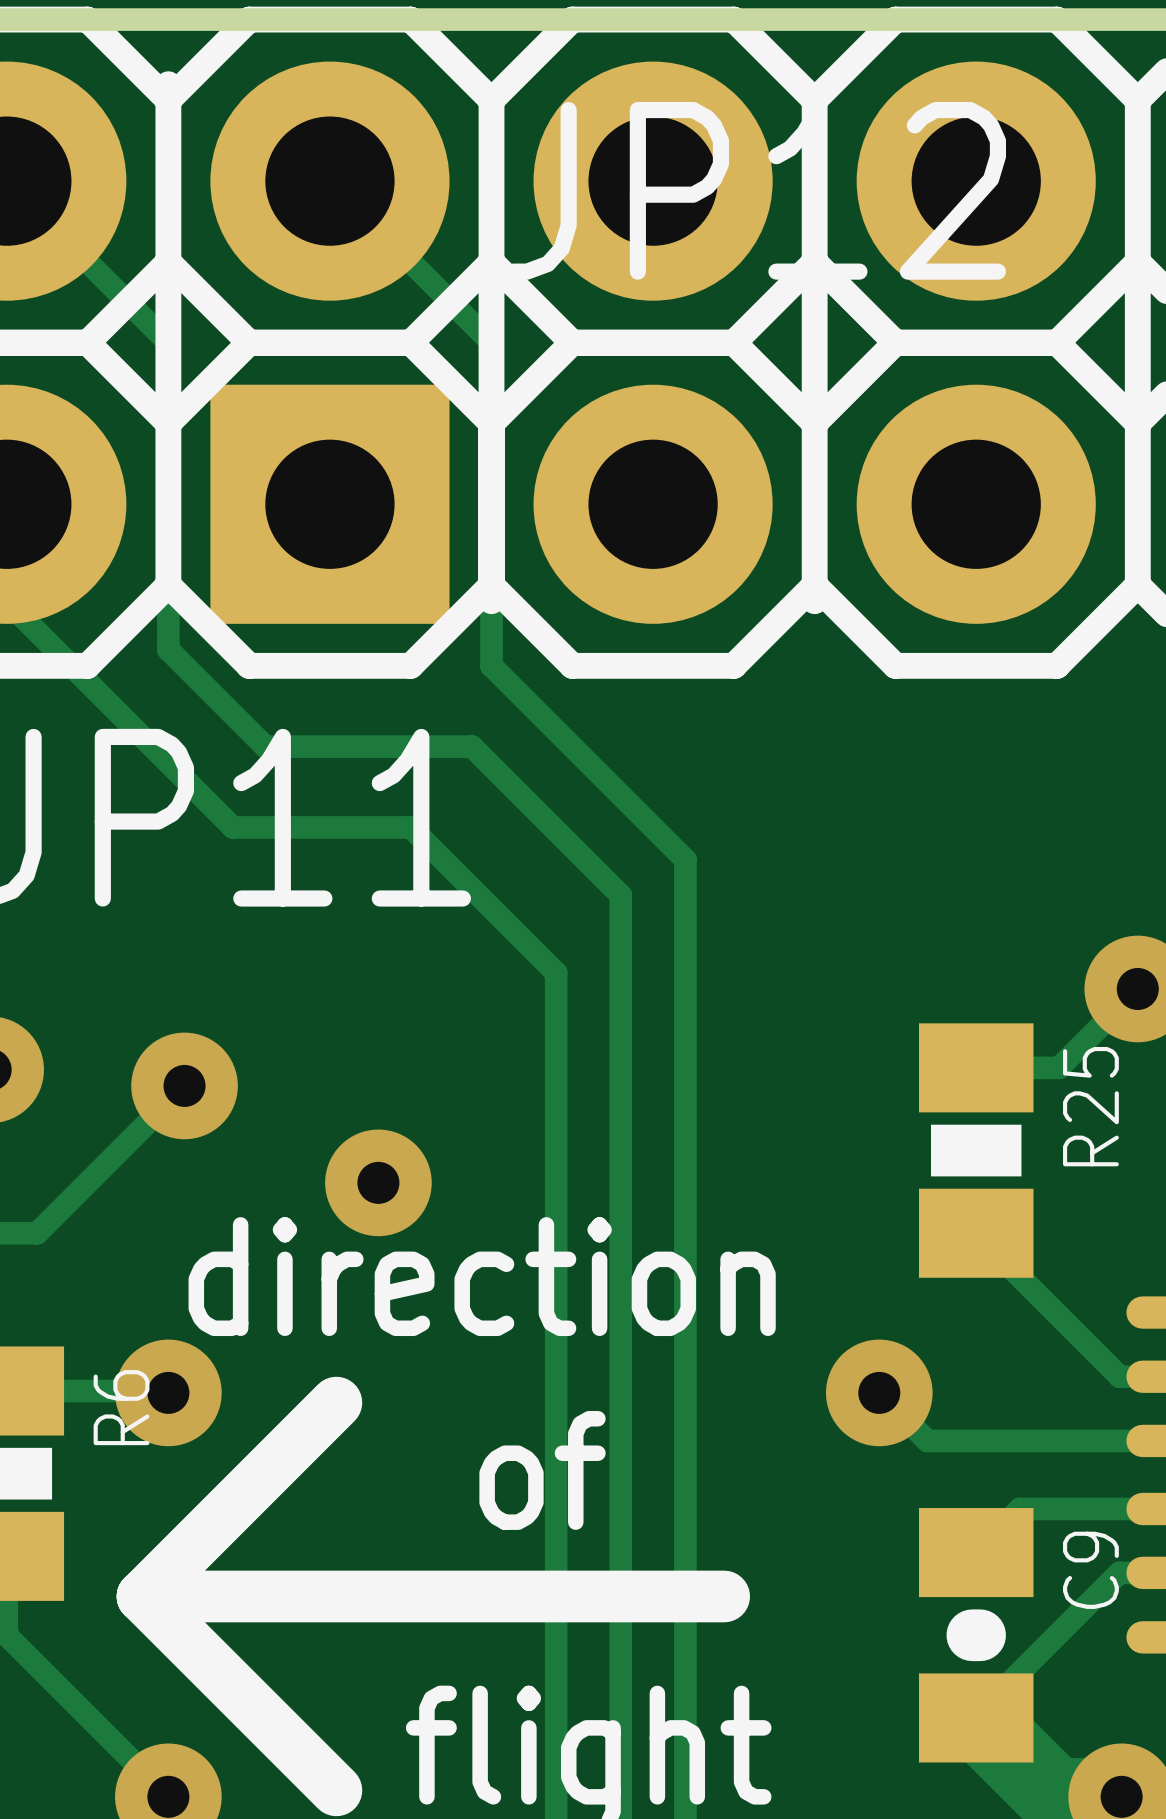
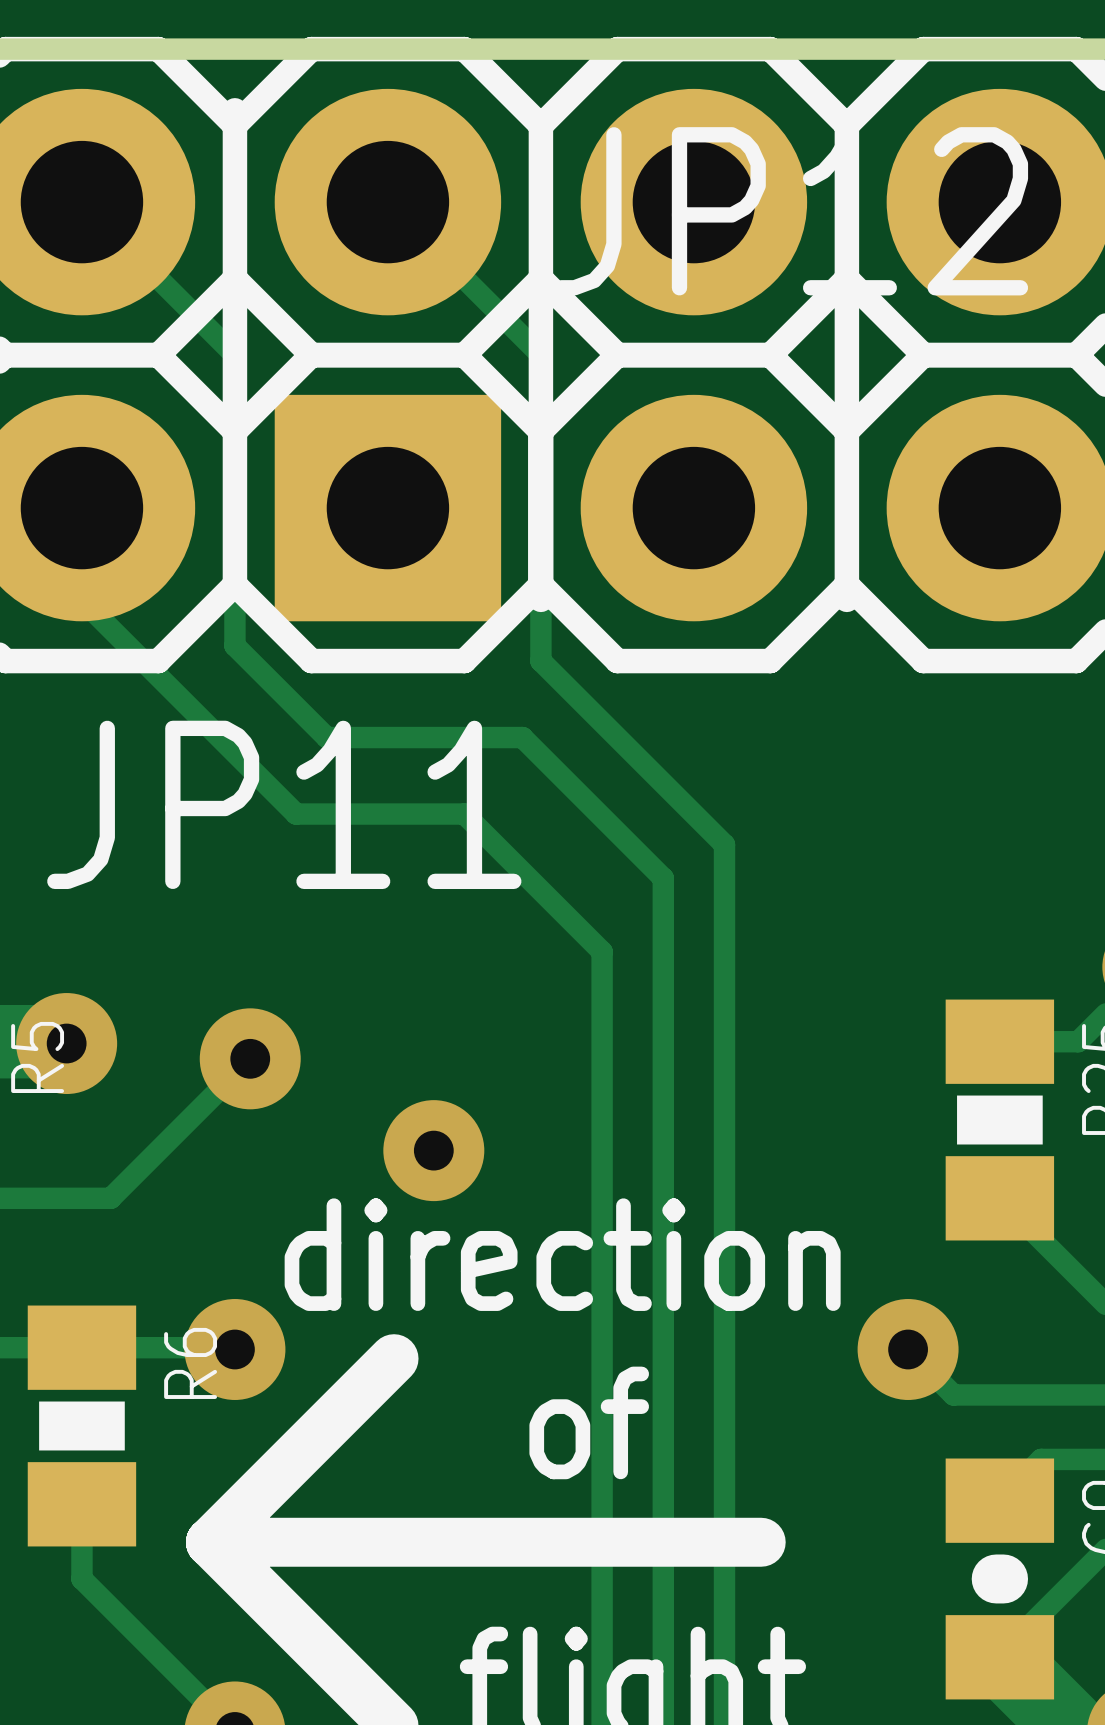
text position: direction (482, 1276) -> direction (562, 1254)

